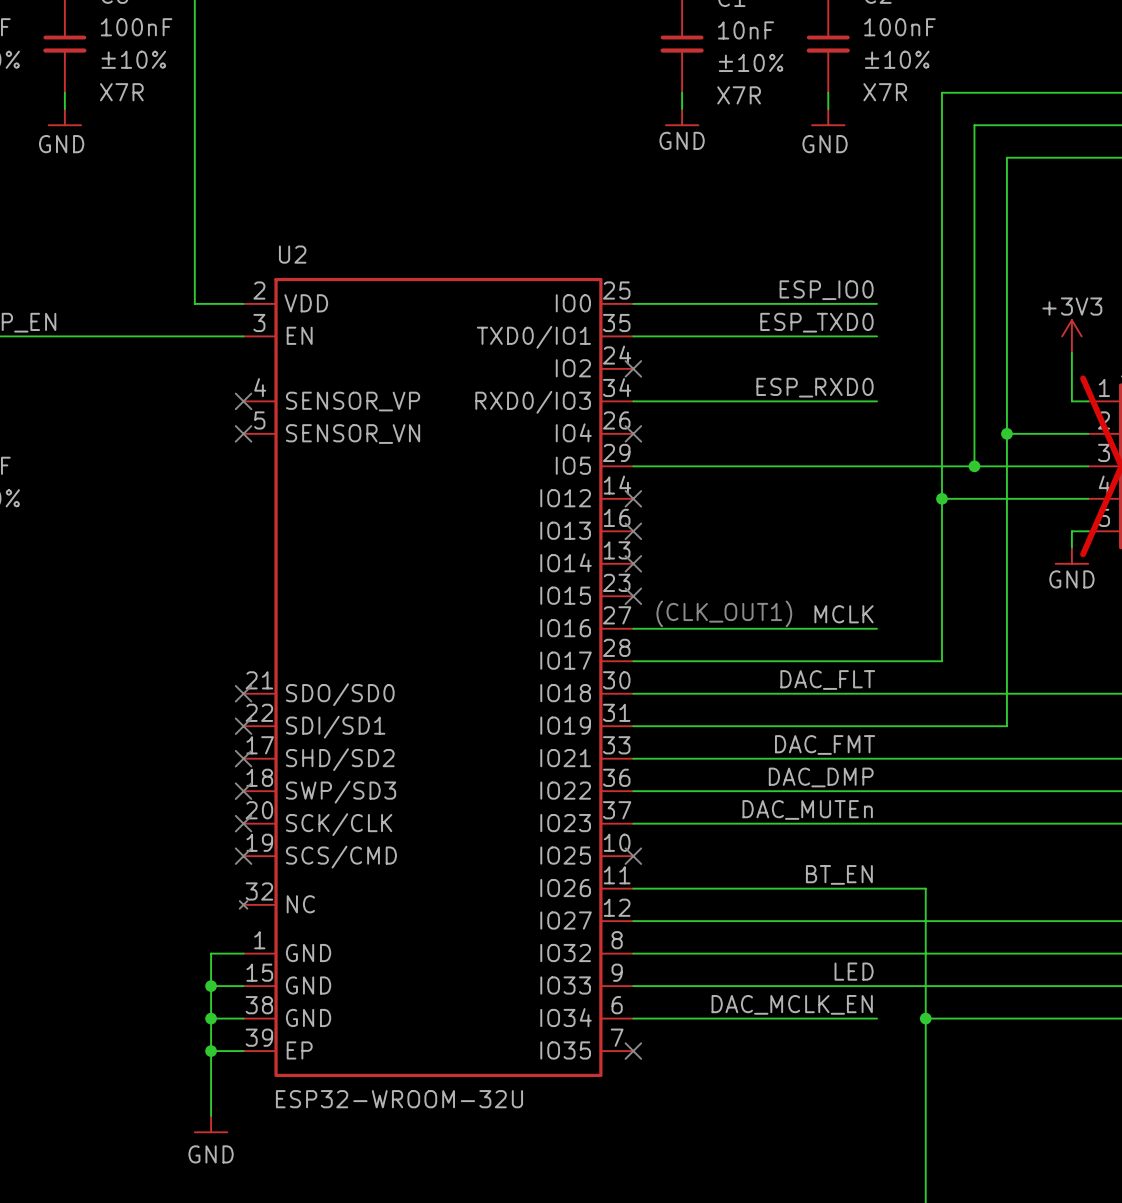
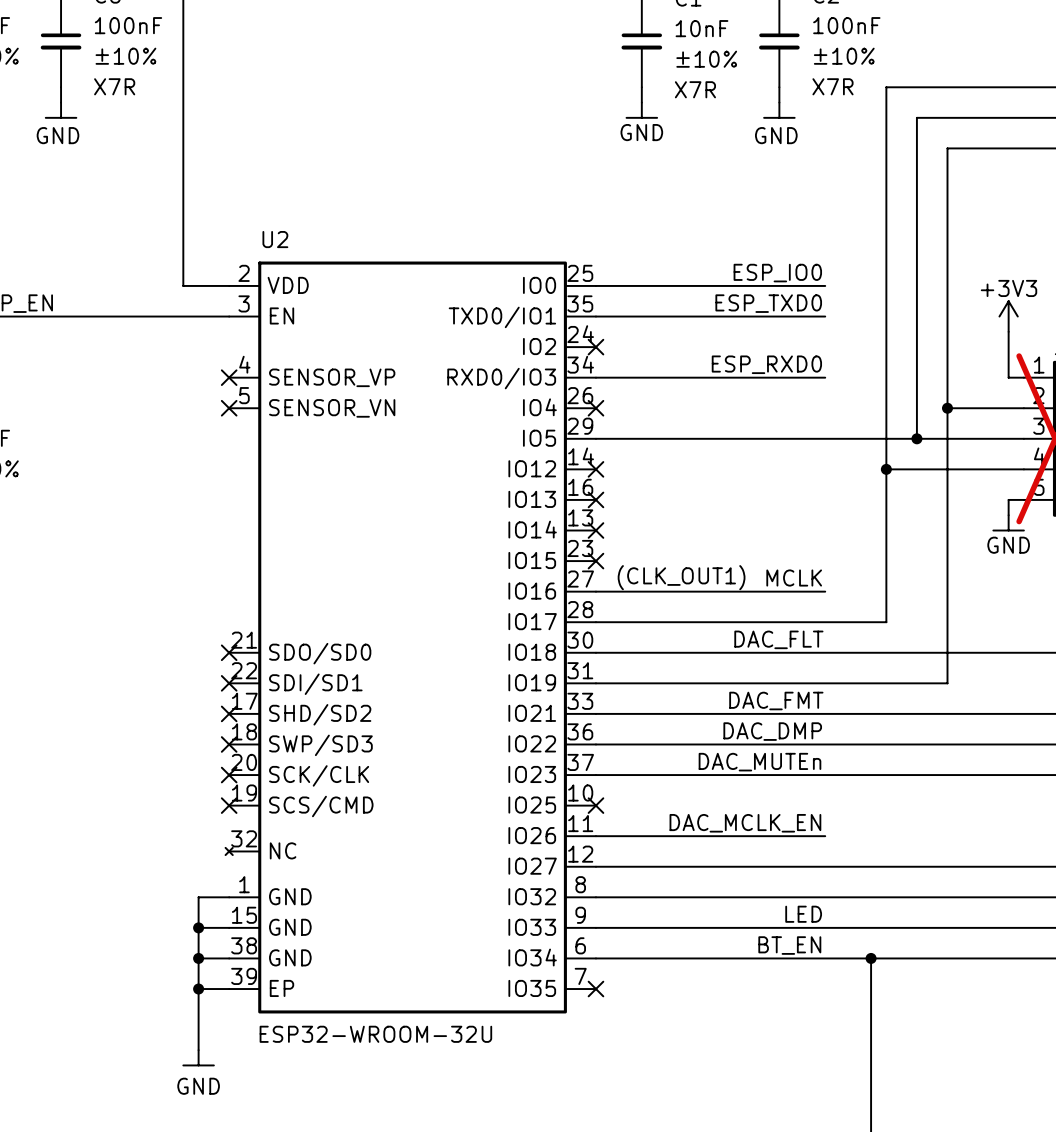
label: BT_EN (839, 874) -> DAC_MCLK_EN (745, 823)
wire: (877, 888) (925, 888) (925, 1018) -> (825, 958) (871, 958)
label: DAC_MCLK_EN (792, 1004) -> BT_EN (789, 945)

